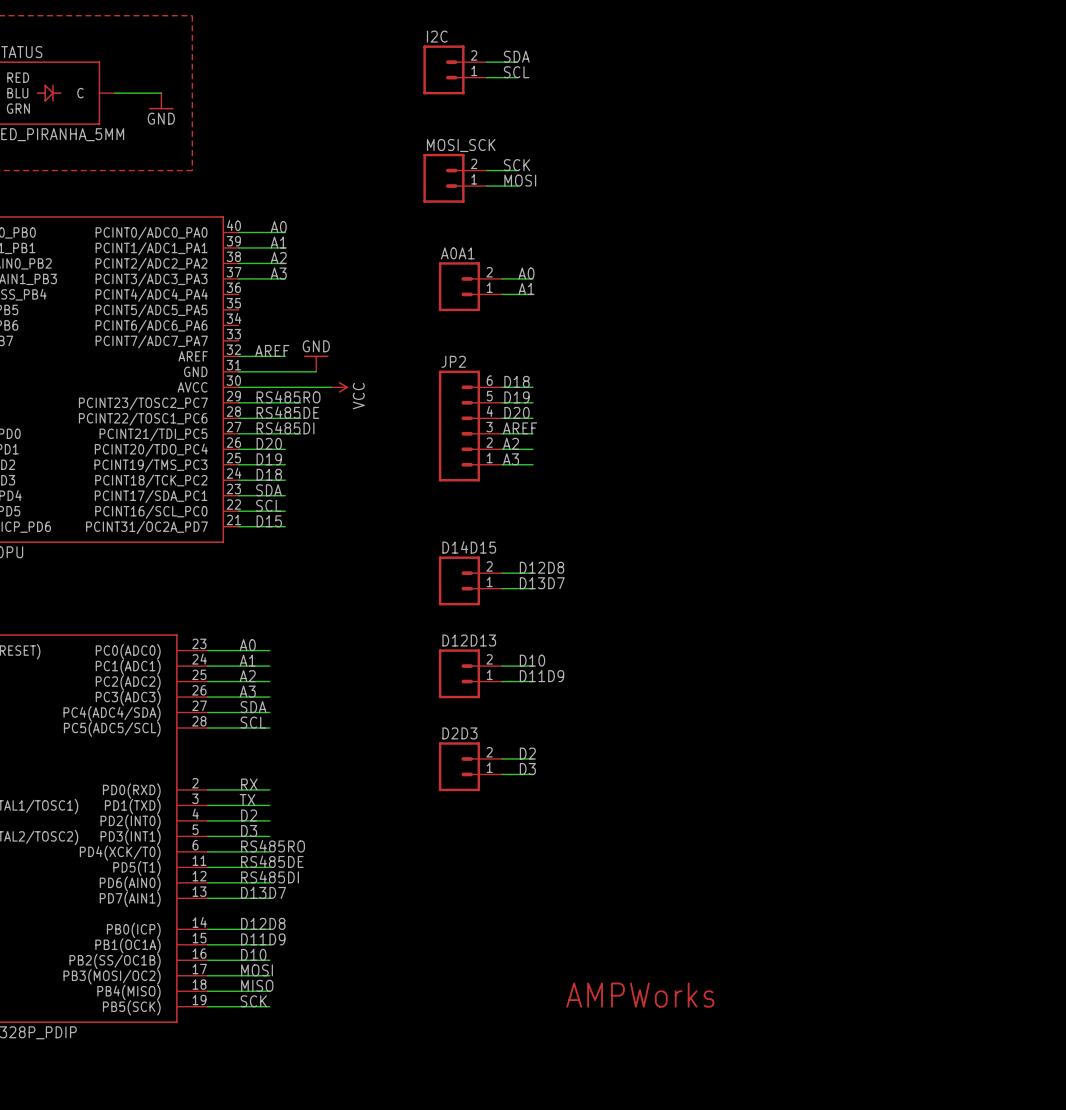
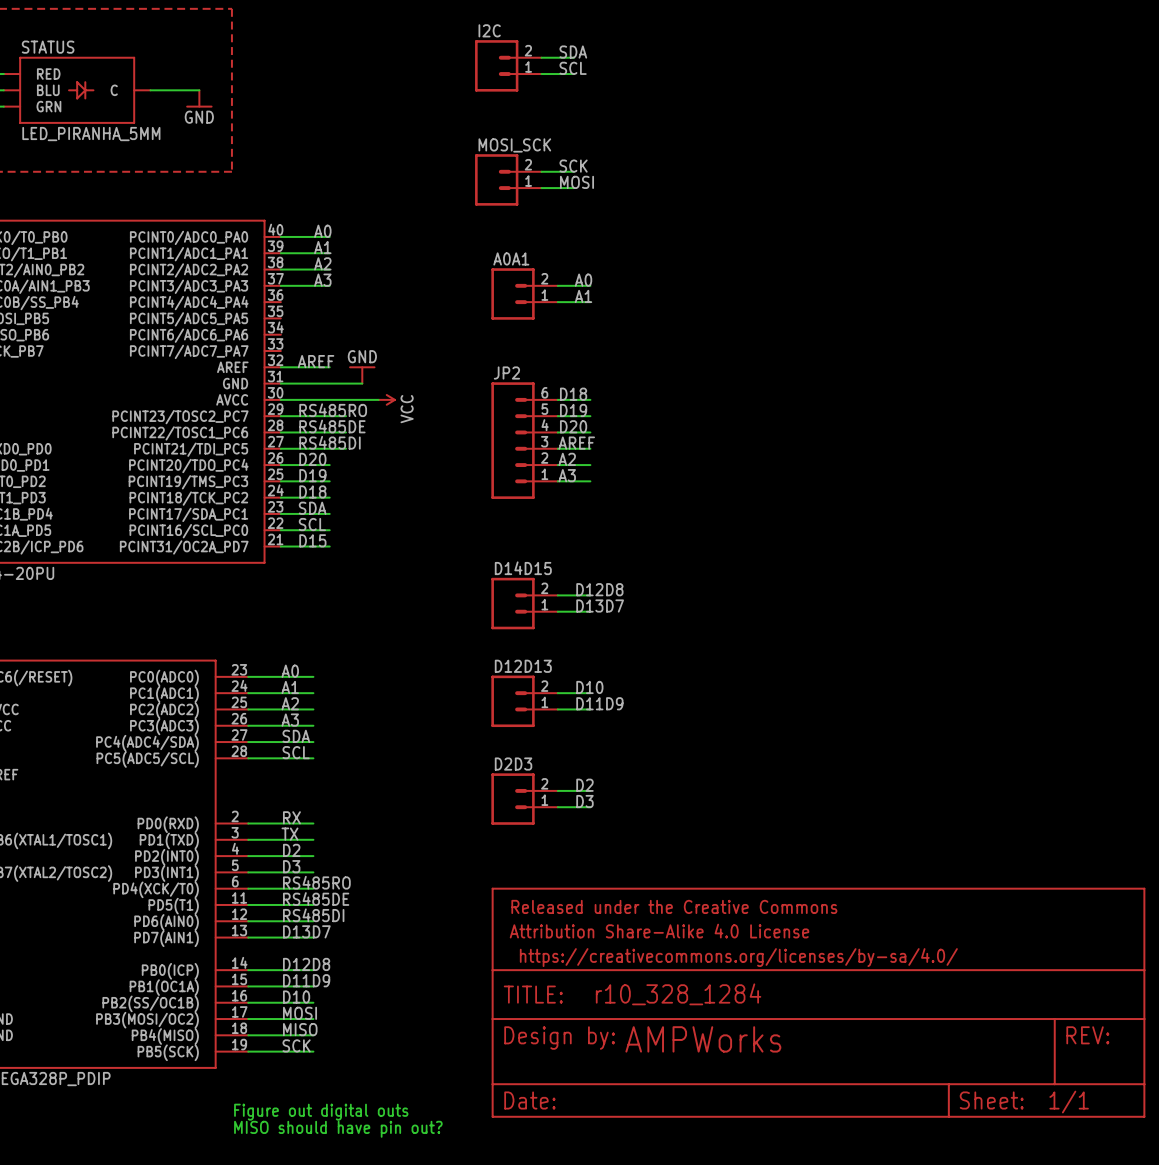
part: none -> (818, 1002)
text: none -> Figure out digital outs (321, 1112)
text: none -> MISO should have pin out? (338, 1129)

